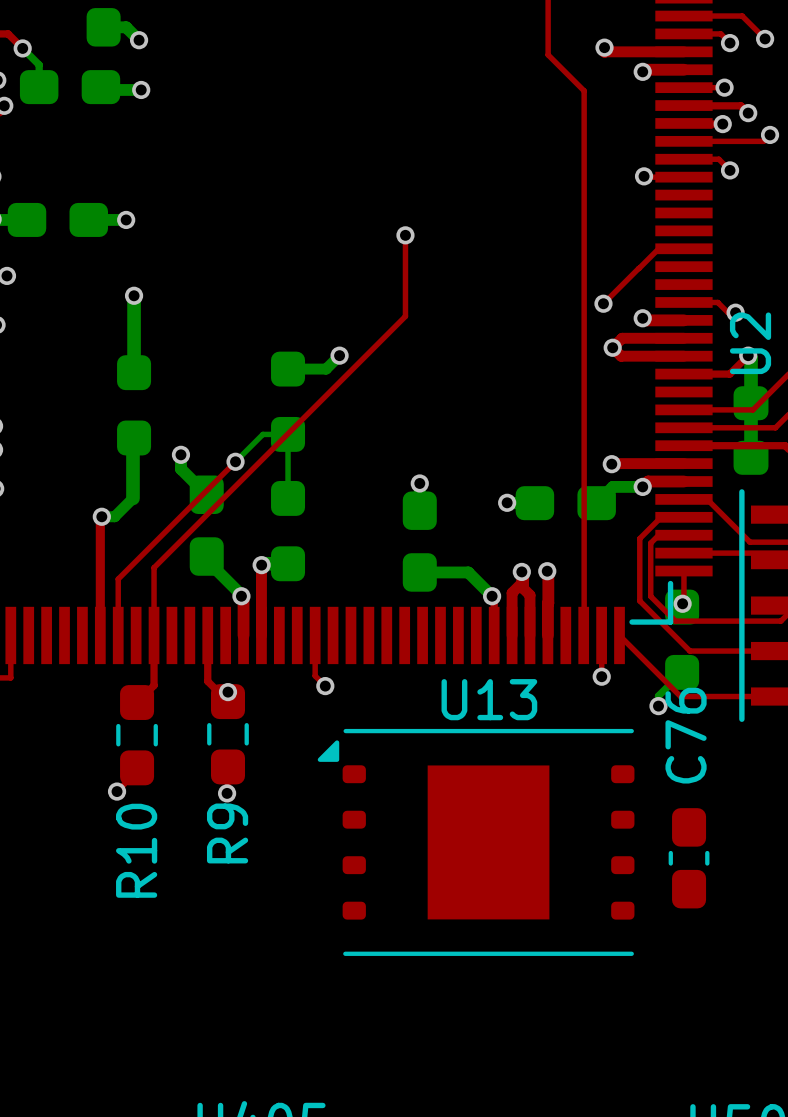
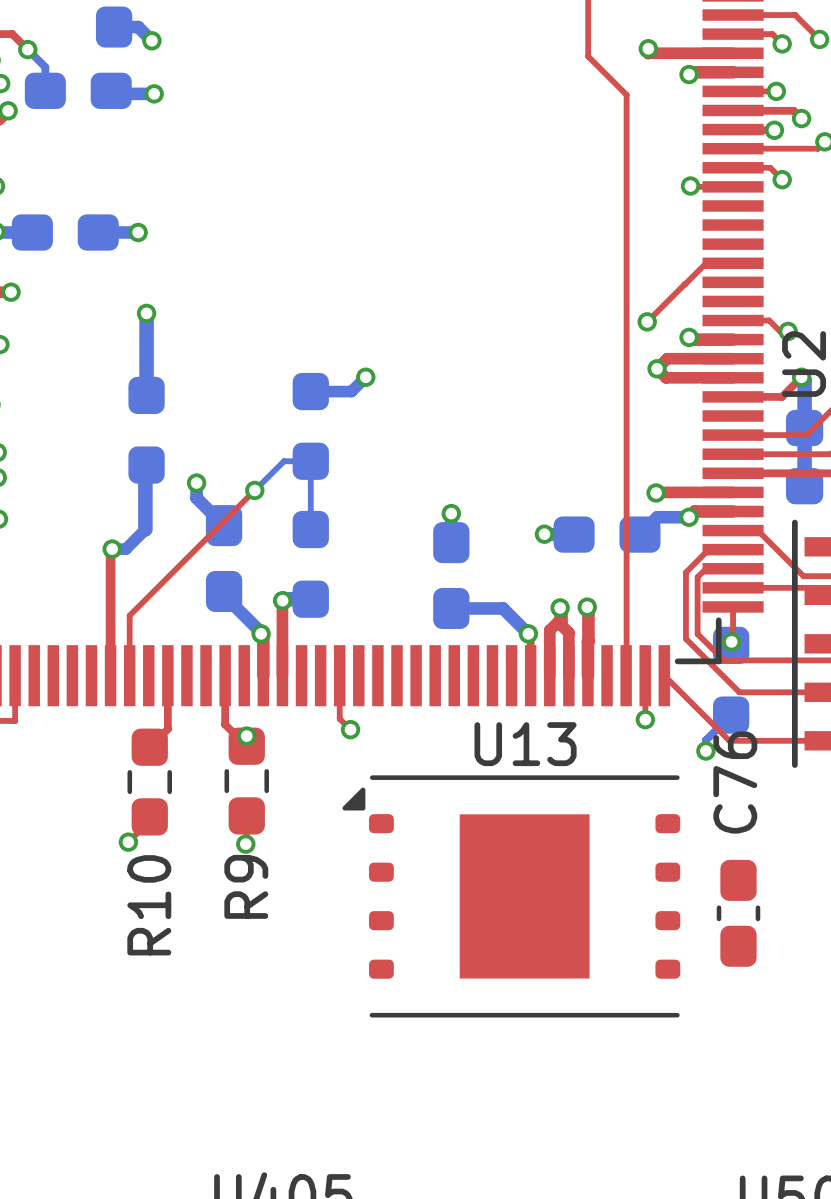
top track: (405, 235) (405, 316) (154, 567) (154, 635) -> none
via: (405, 235) -> none

